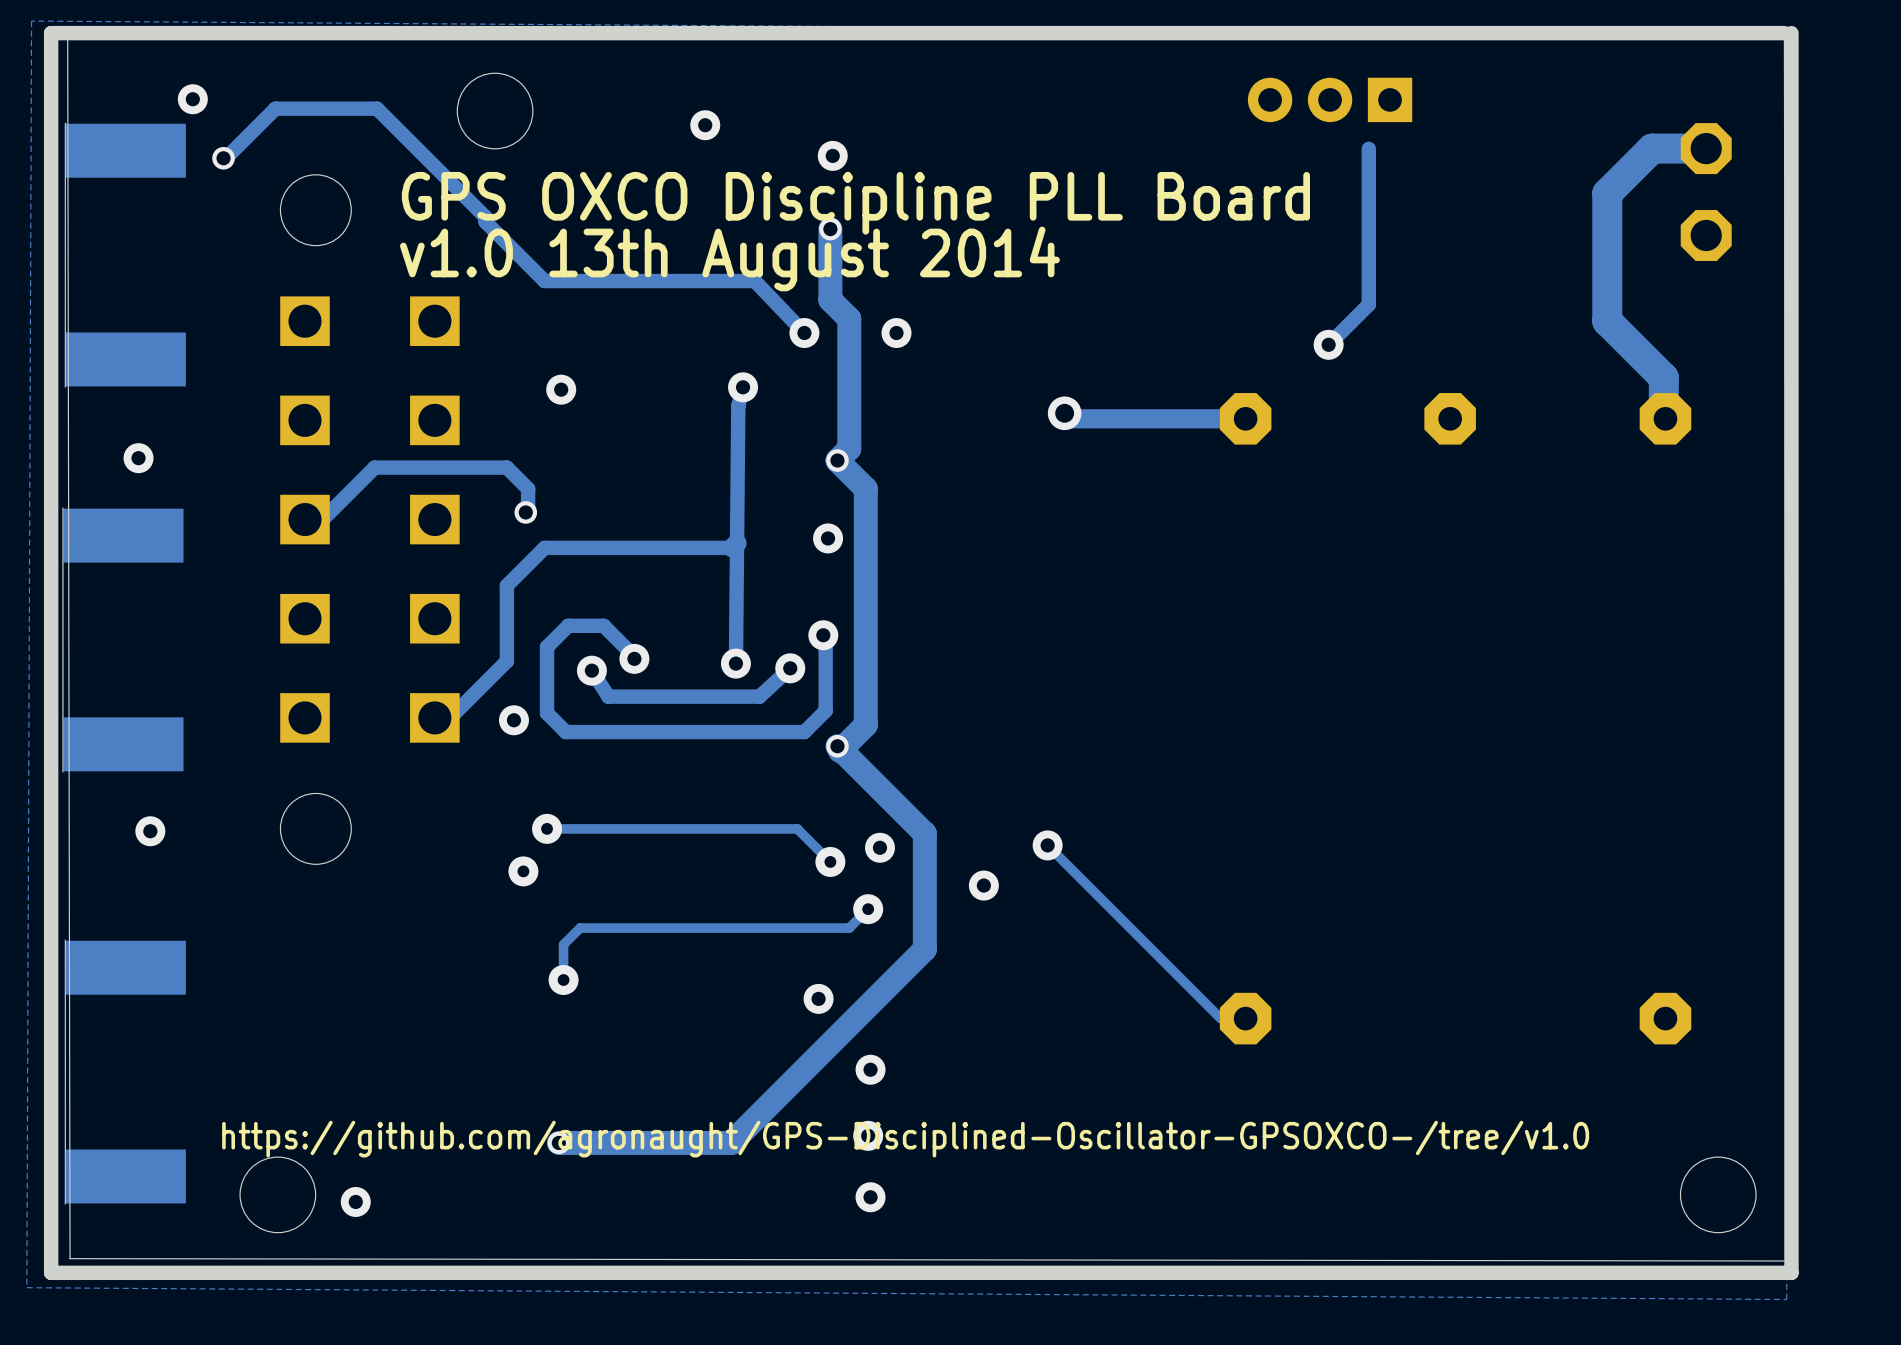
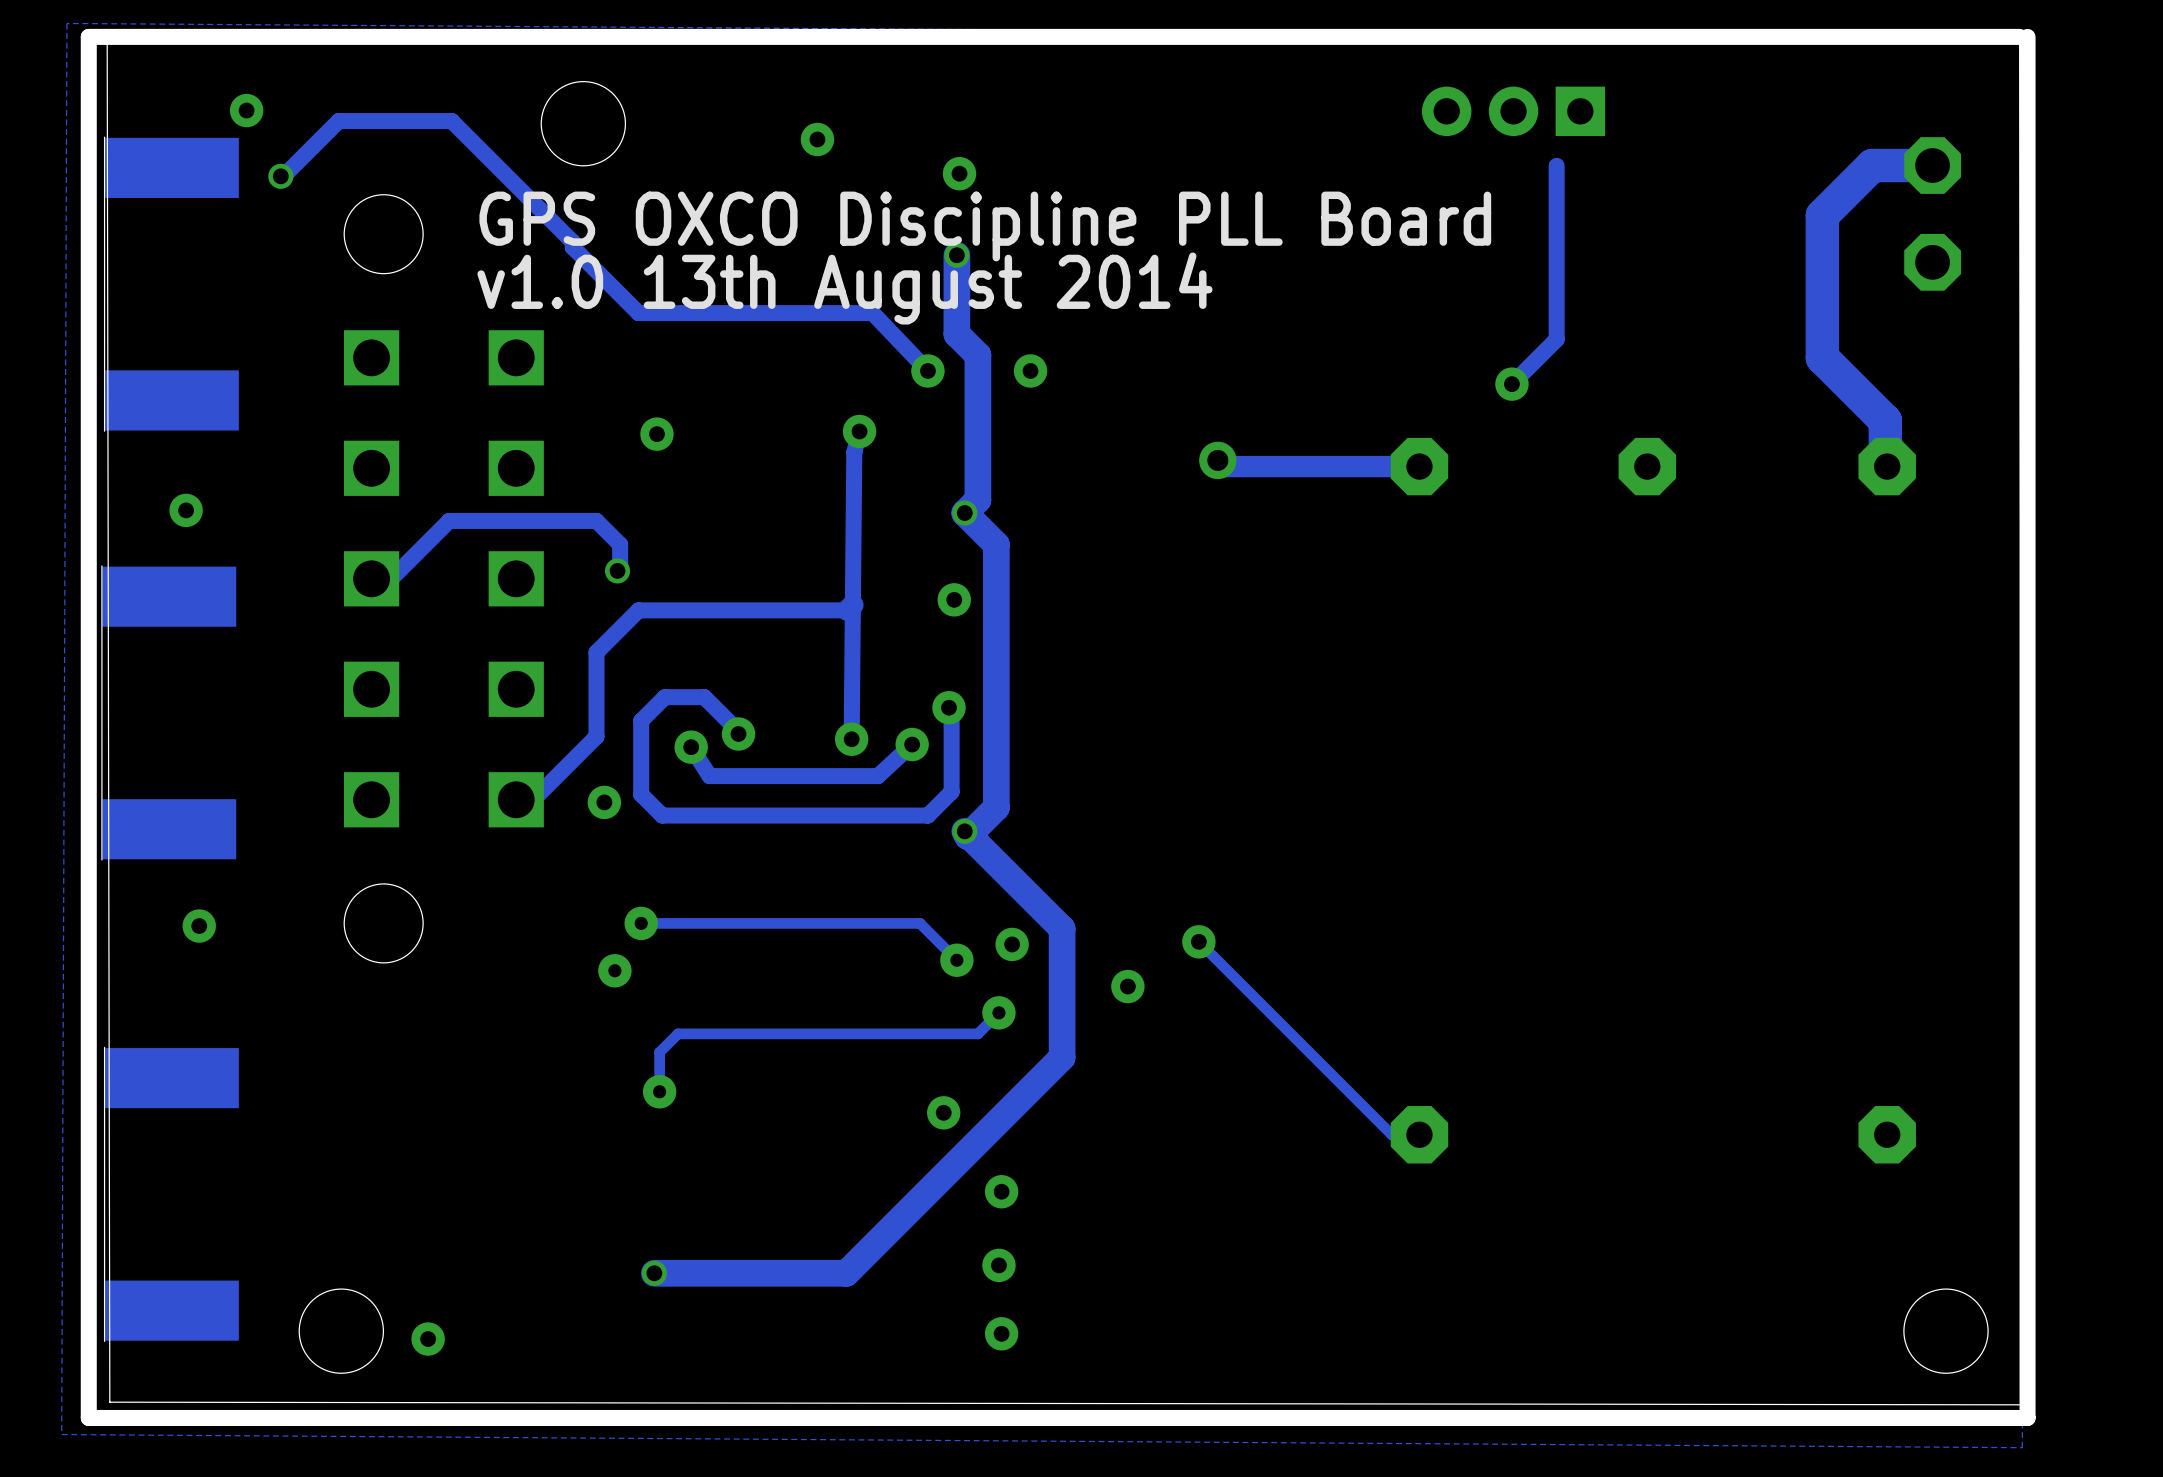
text: https://github.com/agronaught/GPS-Disciplined-Oscillator-GPSOXCO-/tree/v1.0 (905, 1139) -> none

